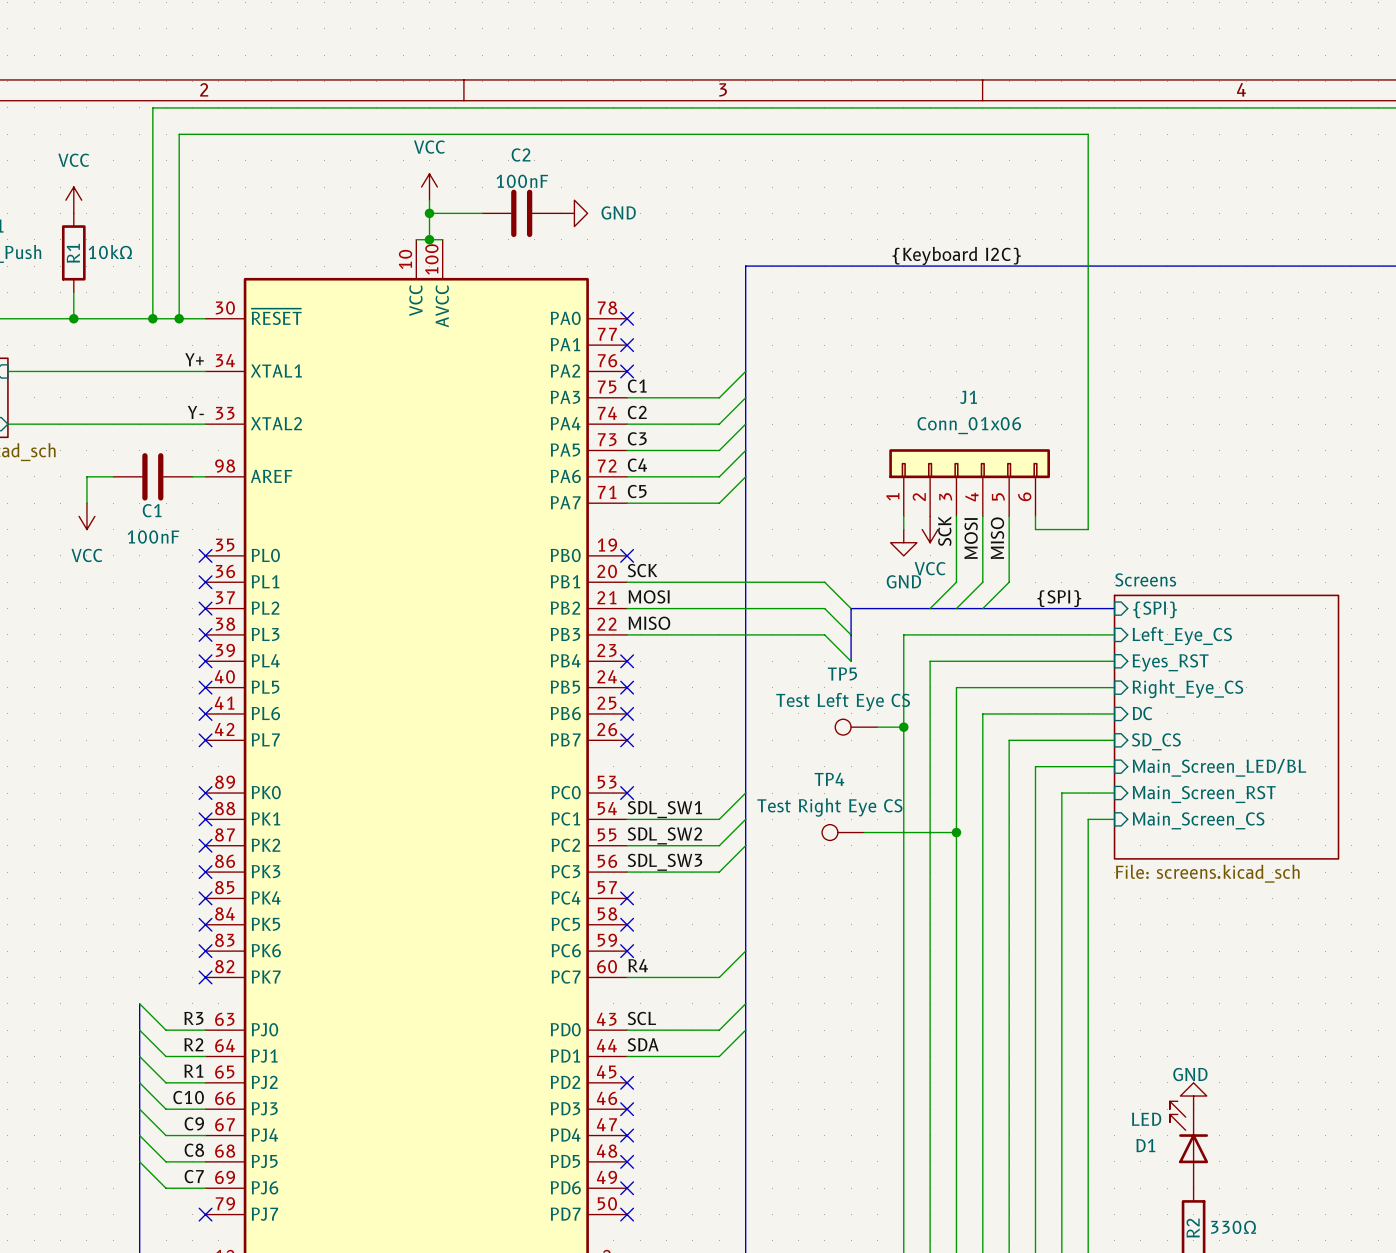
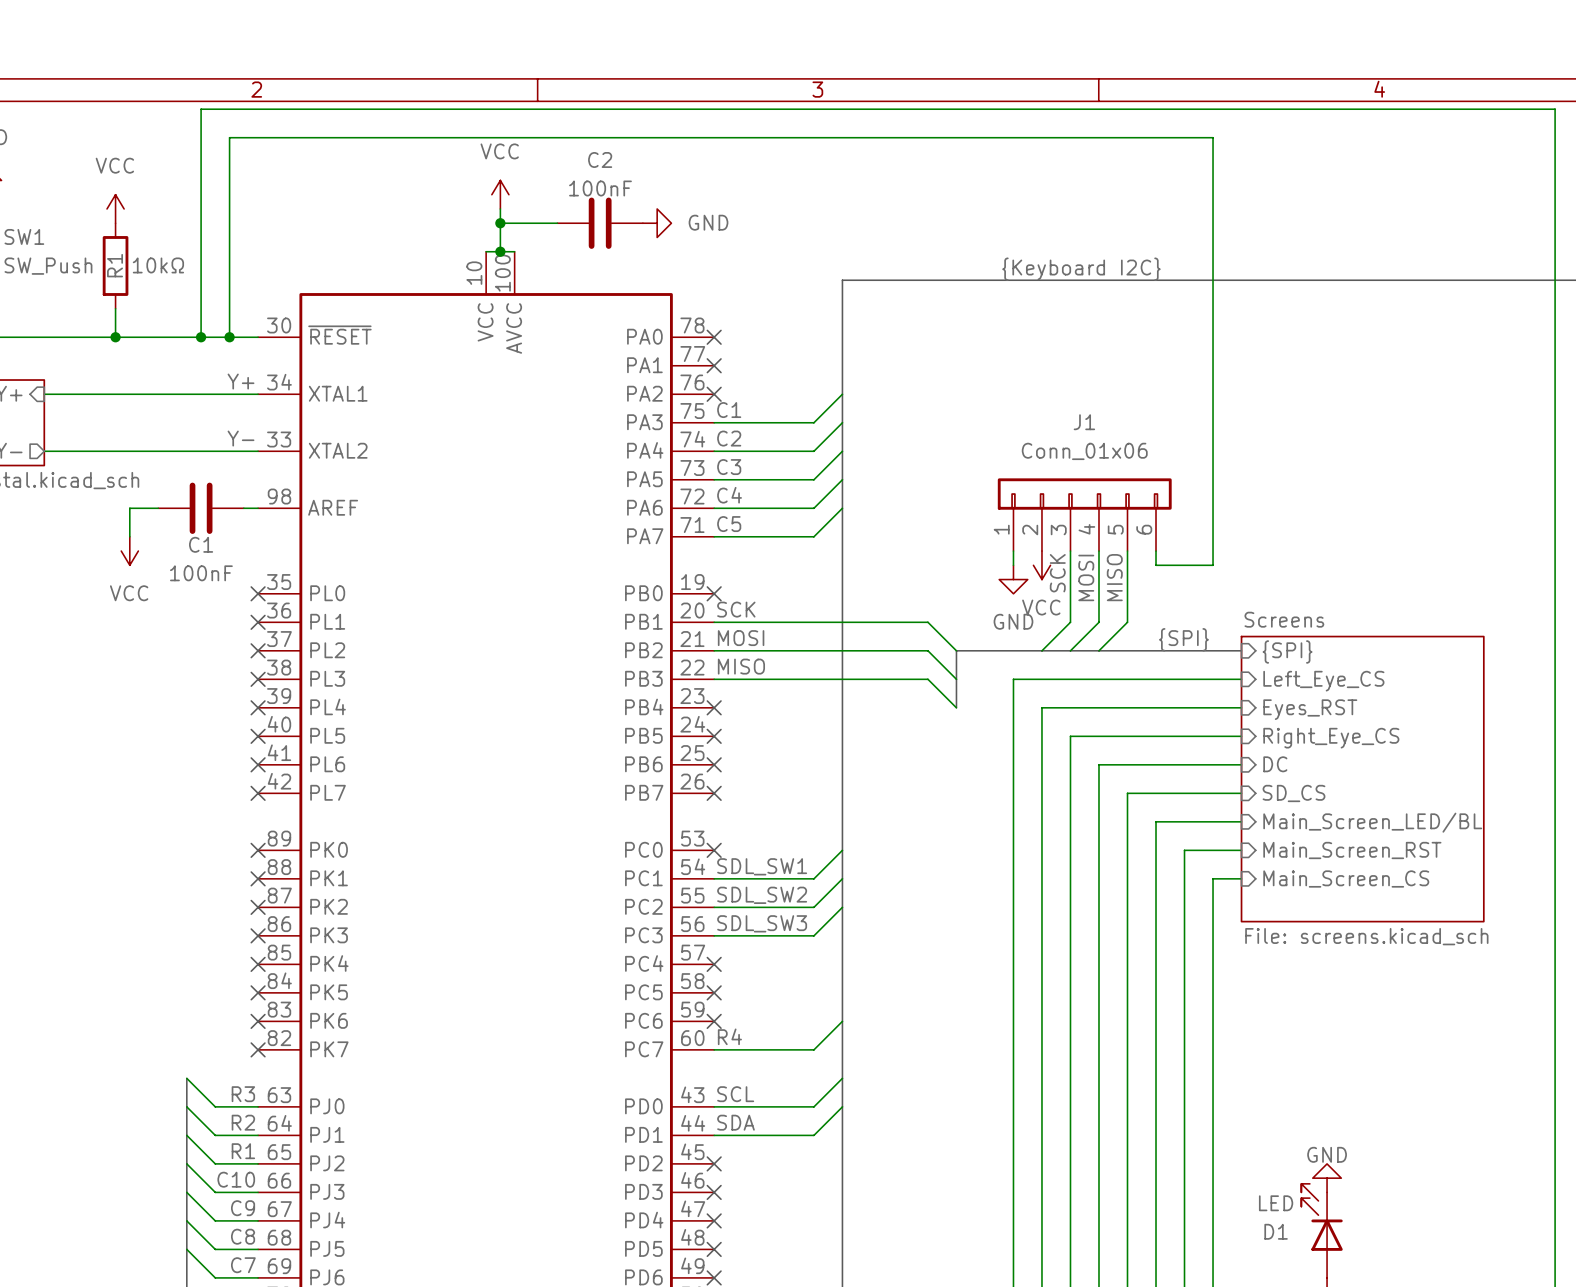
TP5: Test Left Eye CS (856, 727) -> none
wire: (877, 727) (903, 727) -> none
junction: (903, 727) -> none
TP4: Test Right Eye CS (843, 832) -> none
wire: (864, 832) (956, 832) -> none
junction: (956, 832) -> none

